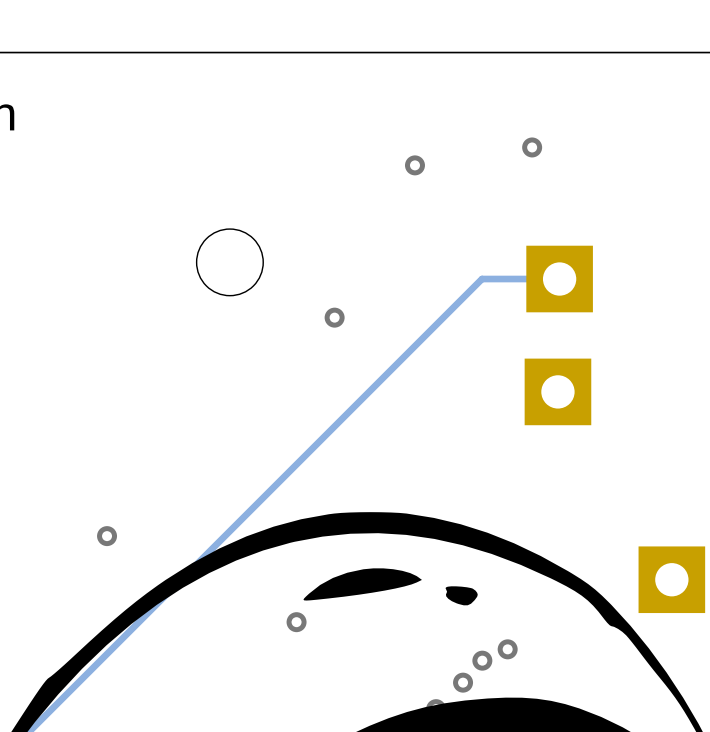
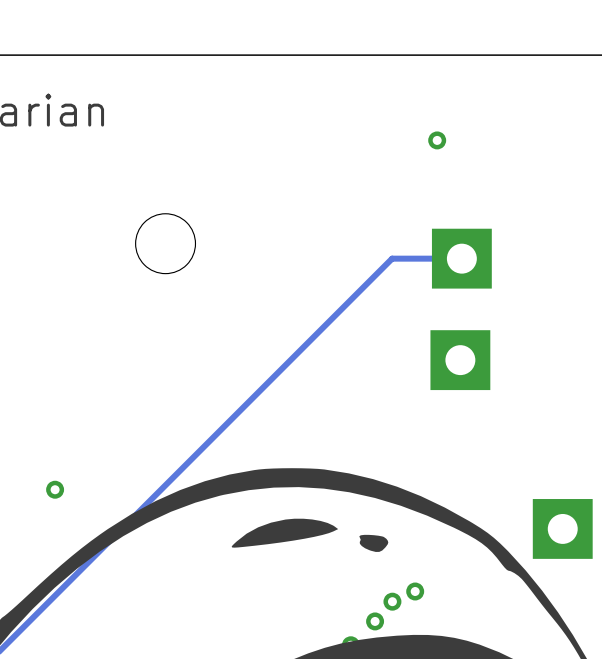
via: (414, 165) -> none
via: (334, 317) -> none
via: (296, 622) -> none

